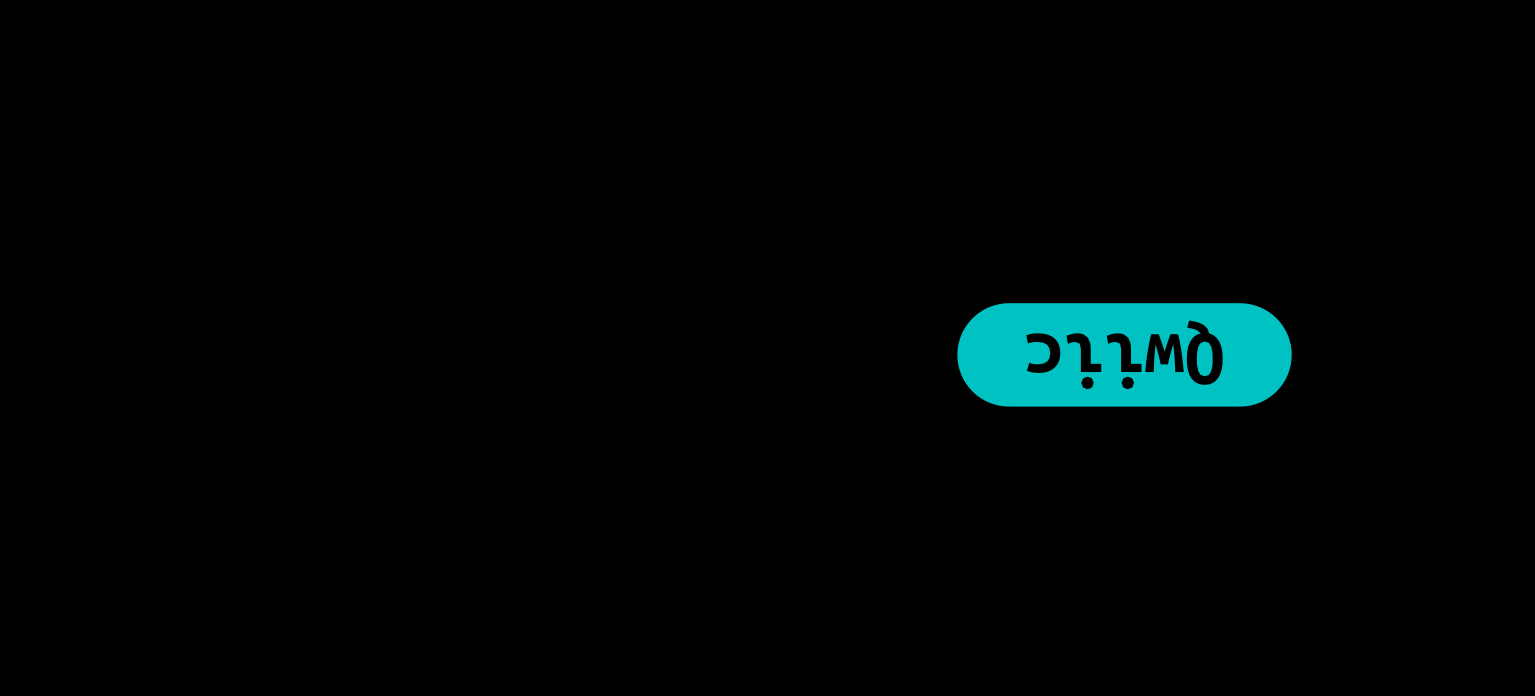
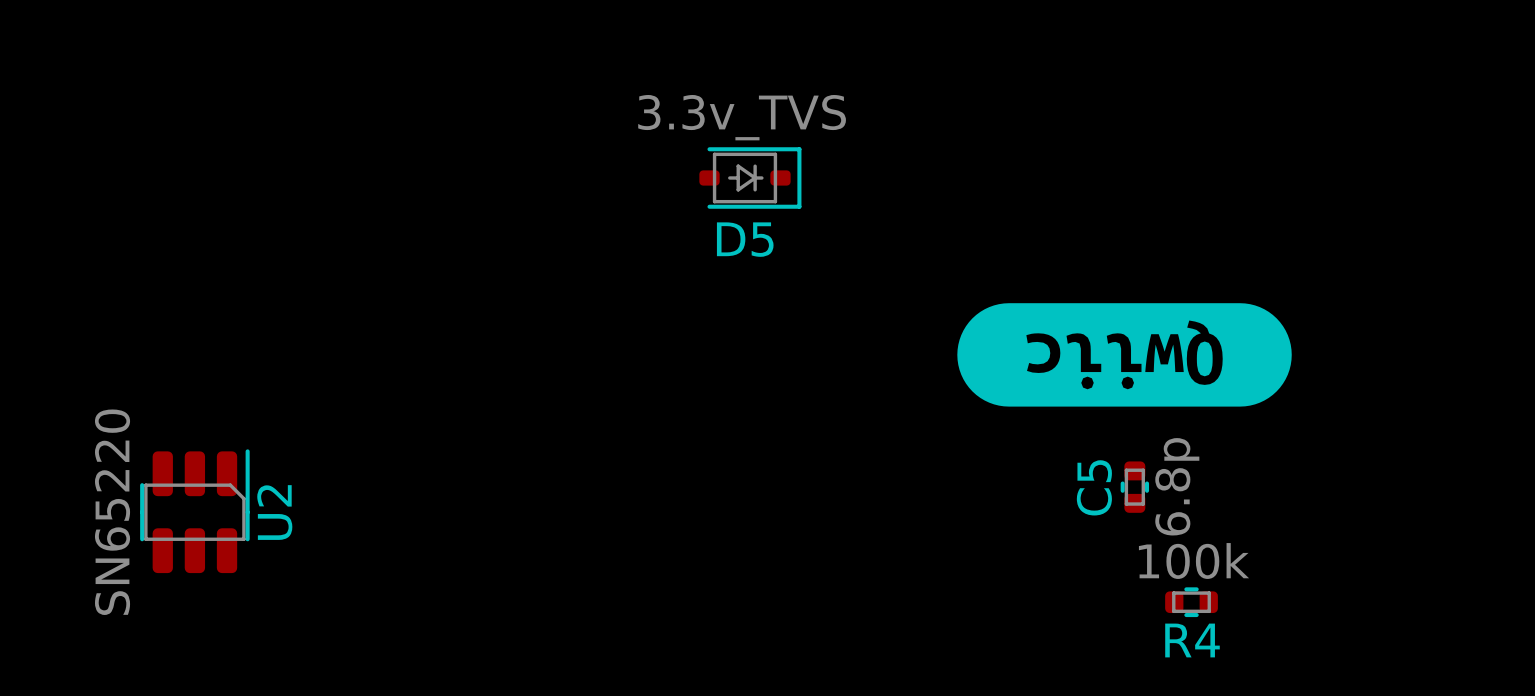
D5: none -> 3.3v_TVS (750, 178)
C5: none -> 6.8p (1134, 487)
U2: none -> SN65220 (194, 511)
R4: none -> 100k (1191, 602)

